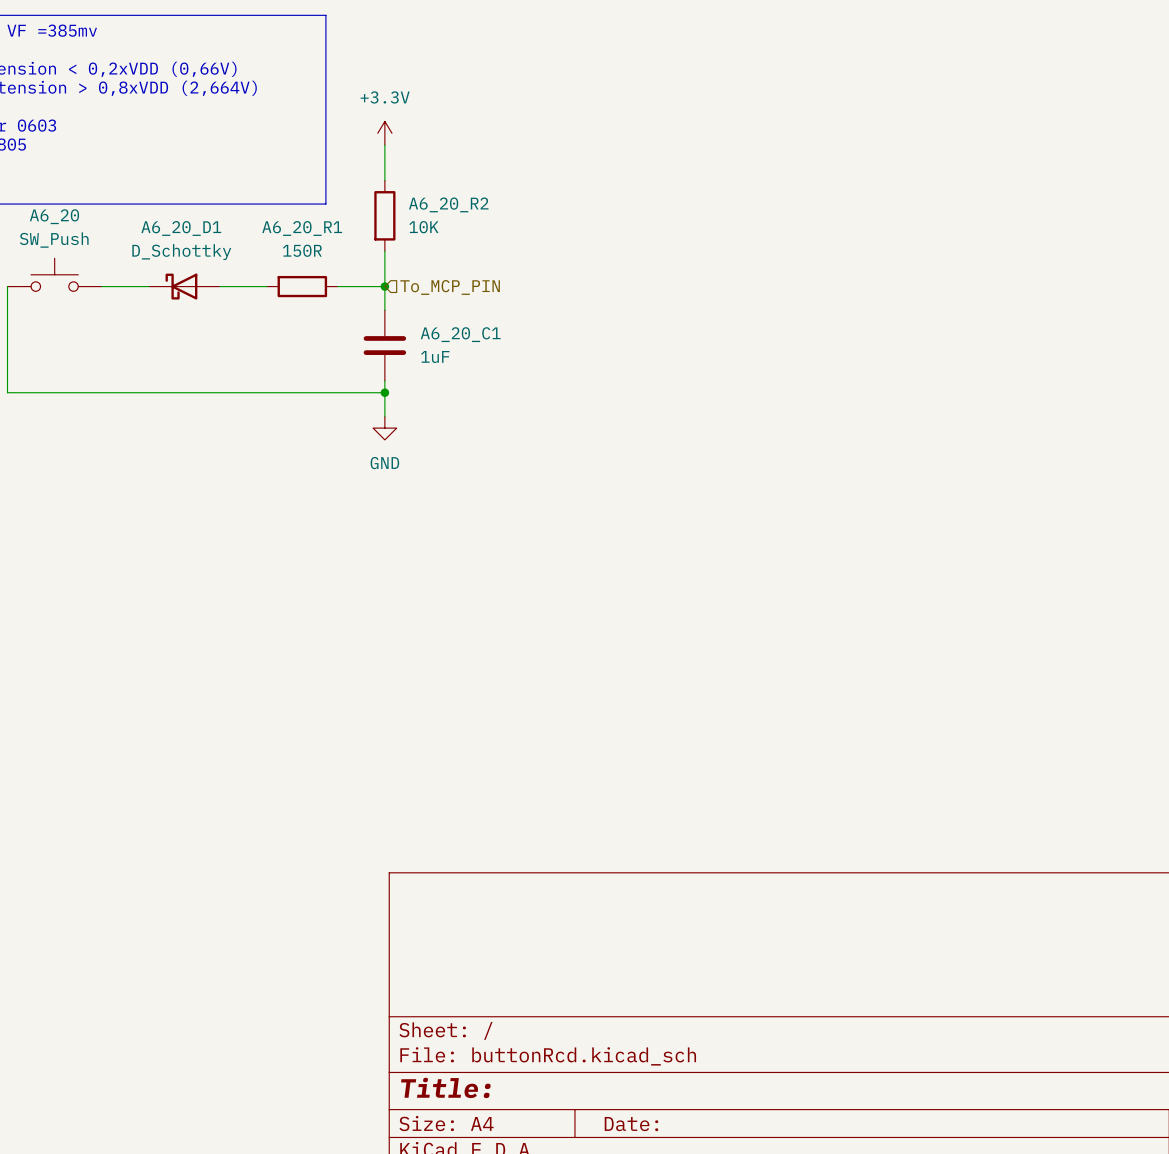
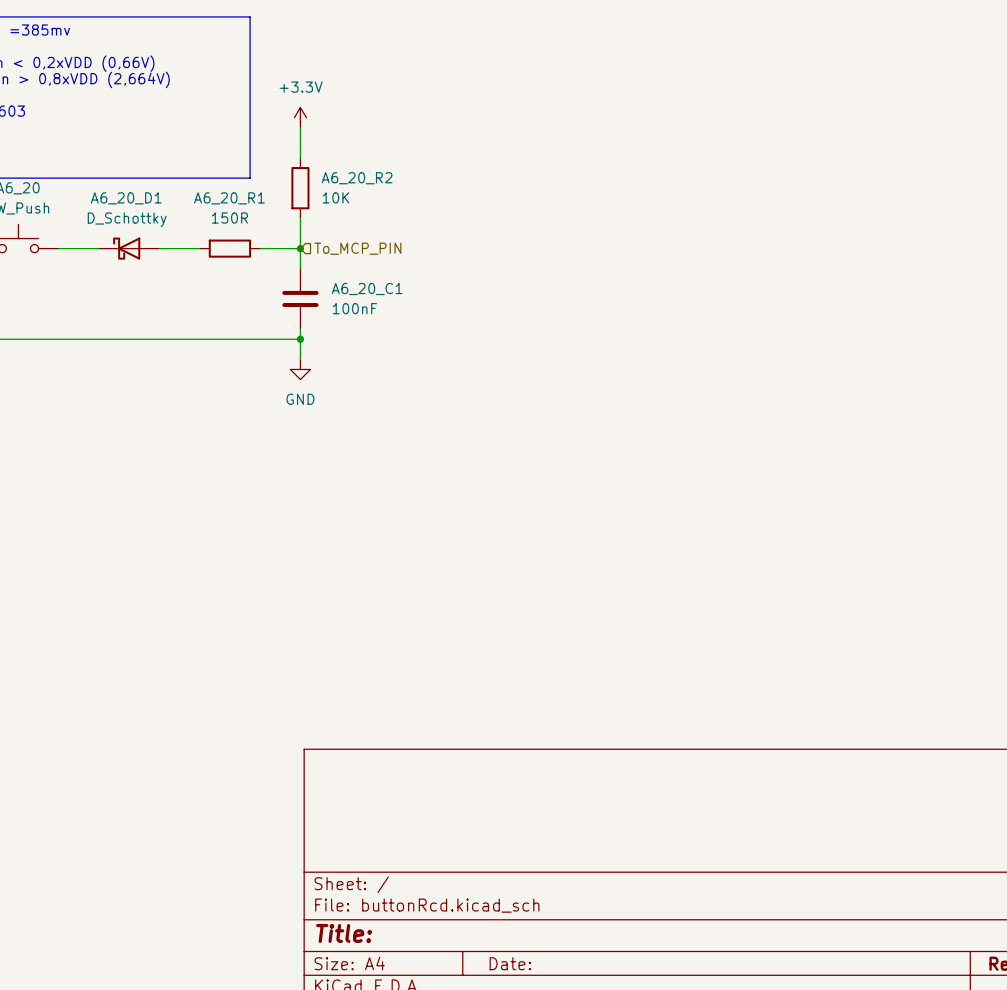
A6_20_C1 value: 1uF (435, 357) -> 100nF (354, 308)

